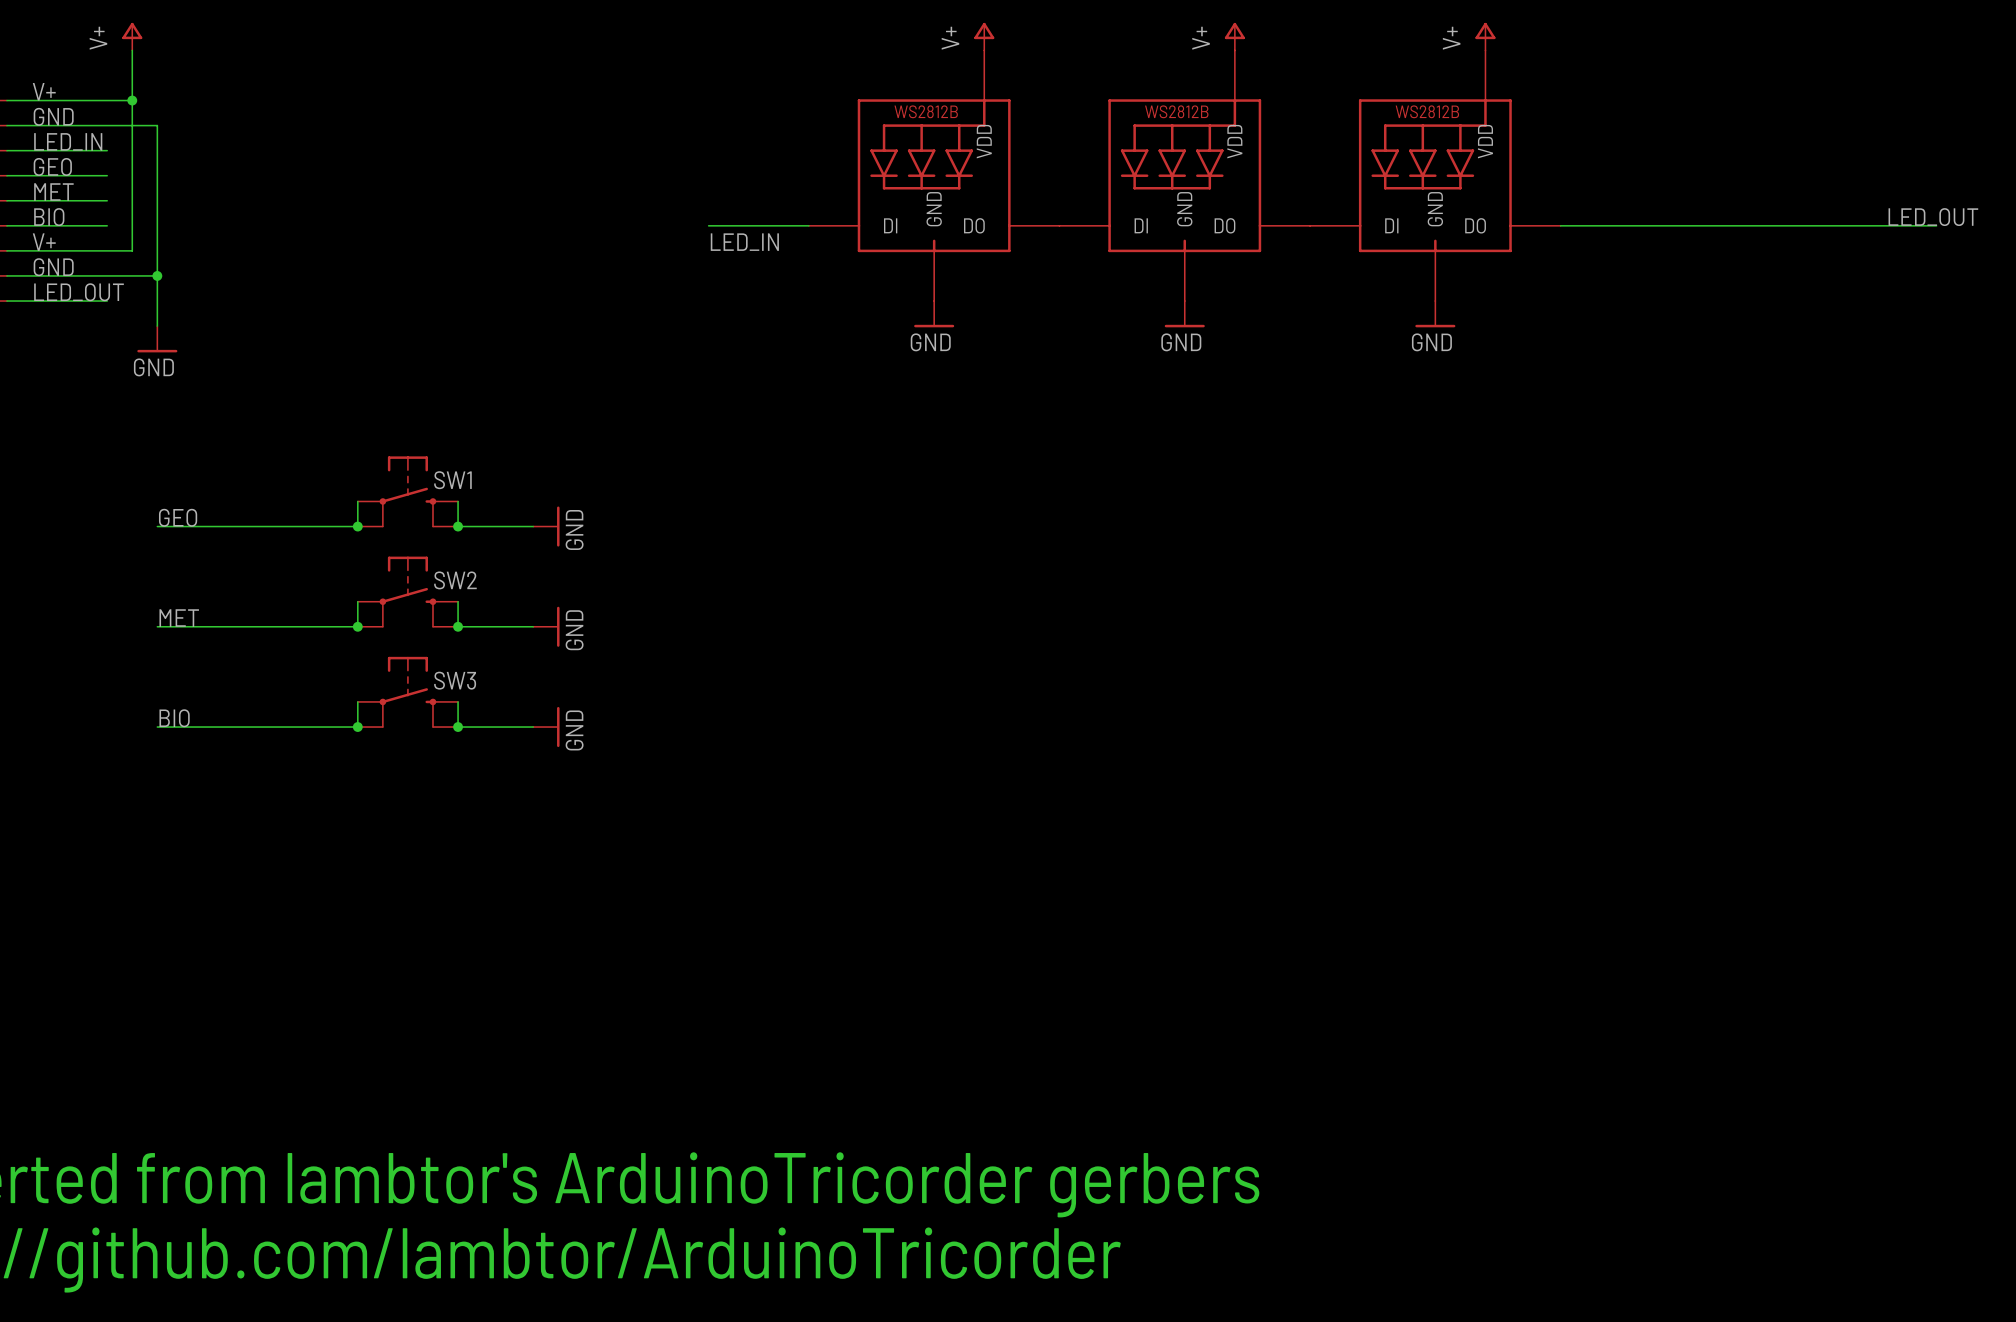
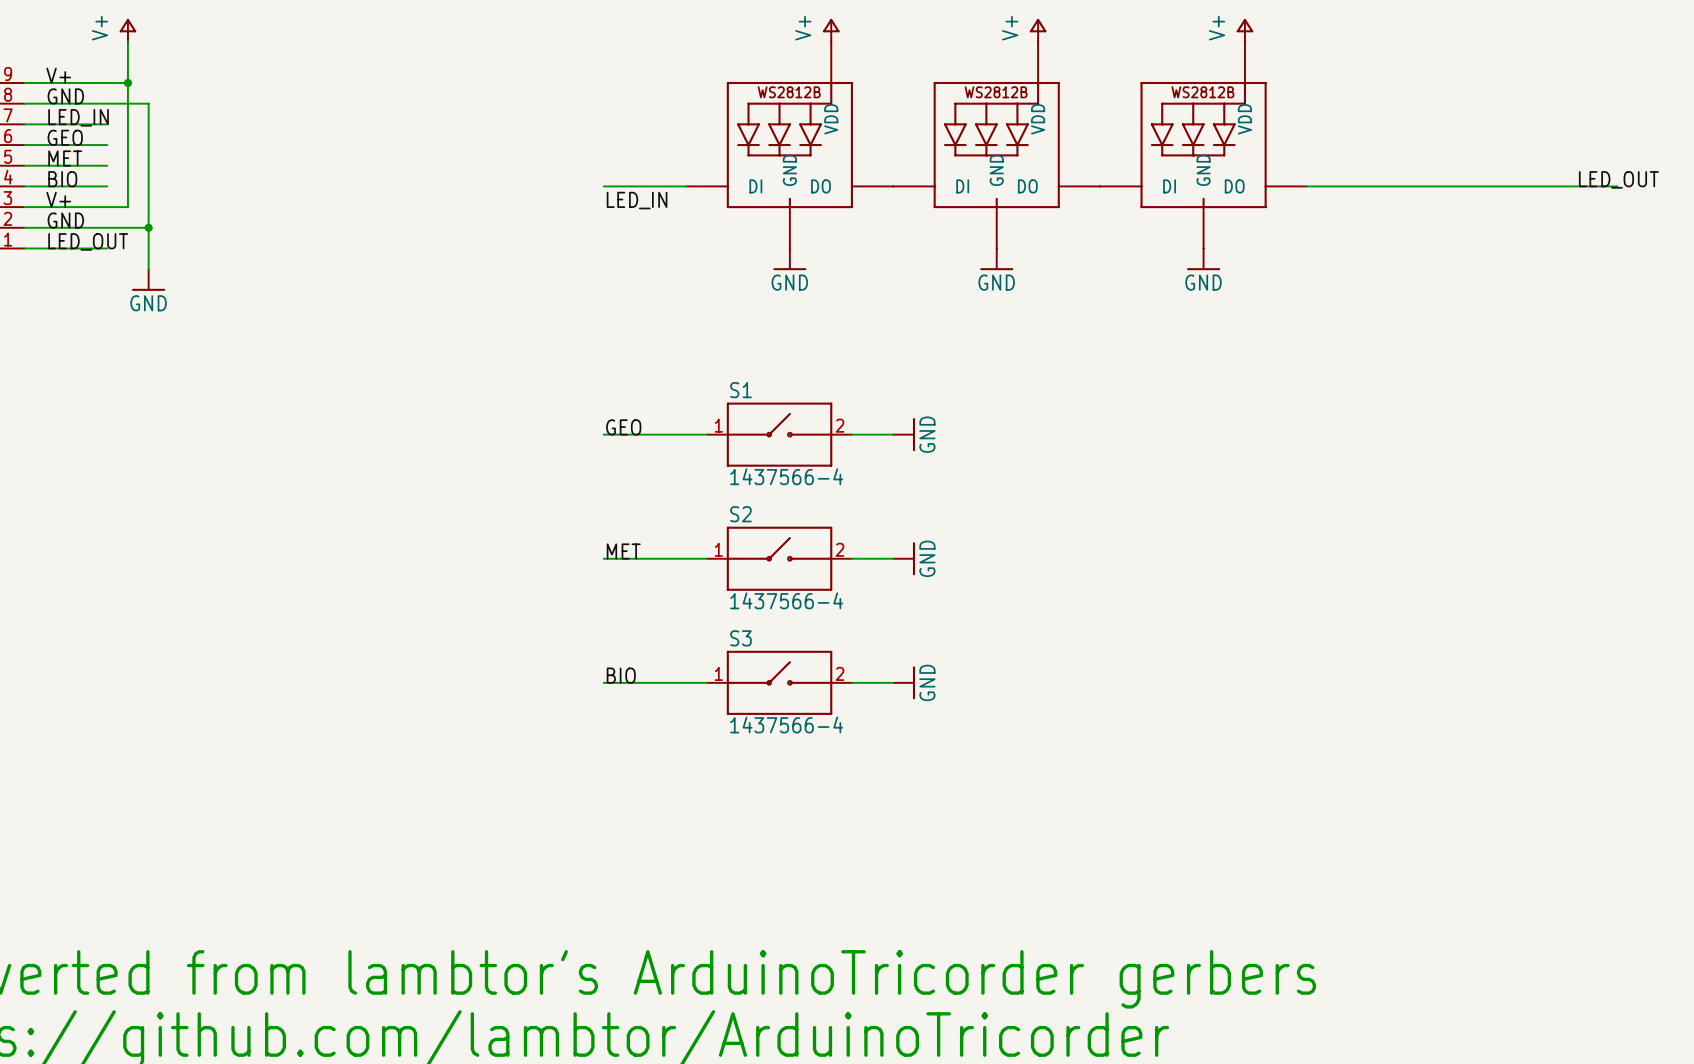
SW1: (407, 491) -> none
wire: (357, 501) (357, 526) (157, 526) -> none
wire: (458, 501) (458, 526) (533, 526) -> none
label: GEO (178, 517) -> none
label: none -> GEO (623, 427)
junction: (357, 526) -> none
junction: (458, 526) -> none
power symbol: GND (546, 526) -> none
wire: none -> (603, 434) (707, 434)
S1: none -> 1437566-4 (779, 434)
wire: none -> (851, 434) (893, 434)
power symbol: none -> GND (904, 434)
SW2: (407, 592) -> none
wire: (357, 601) (357, 626) (157, 626) -> none
wire: (458, 601) (458, 626) (533, 626) -> none
label: MET (179, 618) -> none
junction: (357, 626) -> none
junction: (458, 626) -> none
power symbol: GND (546, 626) -> none
label: none -> MET (623, 551)
wire: none -> (603, 558) (707, 558)
S2: none -> 1437566-4 (779, 558)
wire: none -> (851, 558) (893, 558)
power symbol: none -> GND (904, 558)
SW3: (407, 692) -> none
wire: (357, 701) (357, 727) (157, 727) -> none
wire: (458, 701) (458, 727) (533, 727) -> none
label: BIO (174, 718) -> none
junction: (357, 727) -> none
junction: (458, 727) -> none
power symbol: GND (546, 727) -> none
label: none -> BIO (621, 675)
wire: none -> (603, 682) (707, 682)
S3: none -> 1437566-4 (779, 682)
wire: none -> (851, 682) (893, 682)
power symbol: none -> GND (904, 682)

